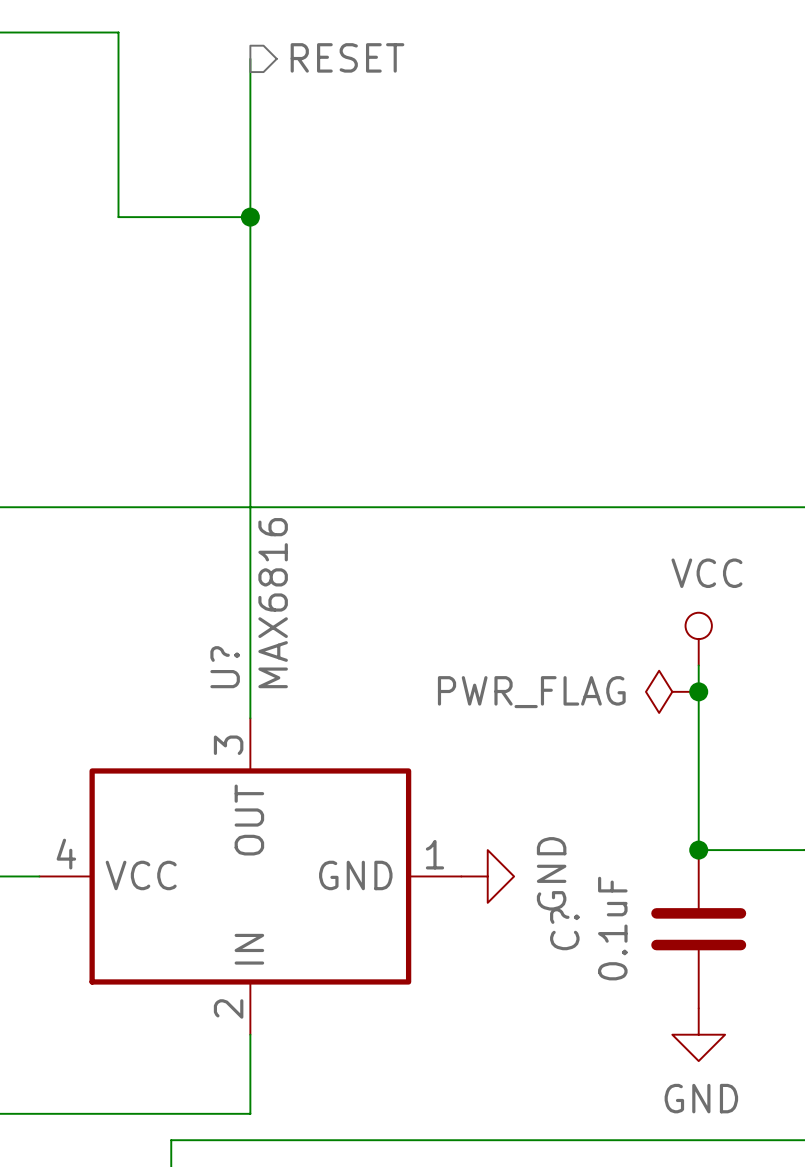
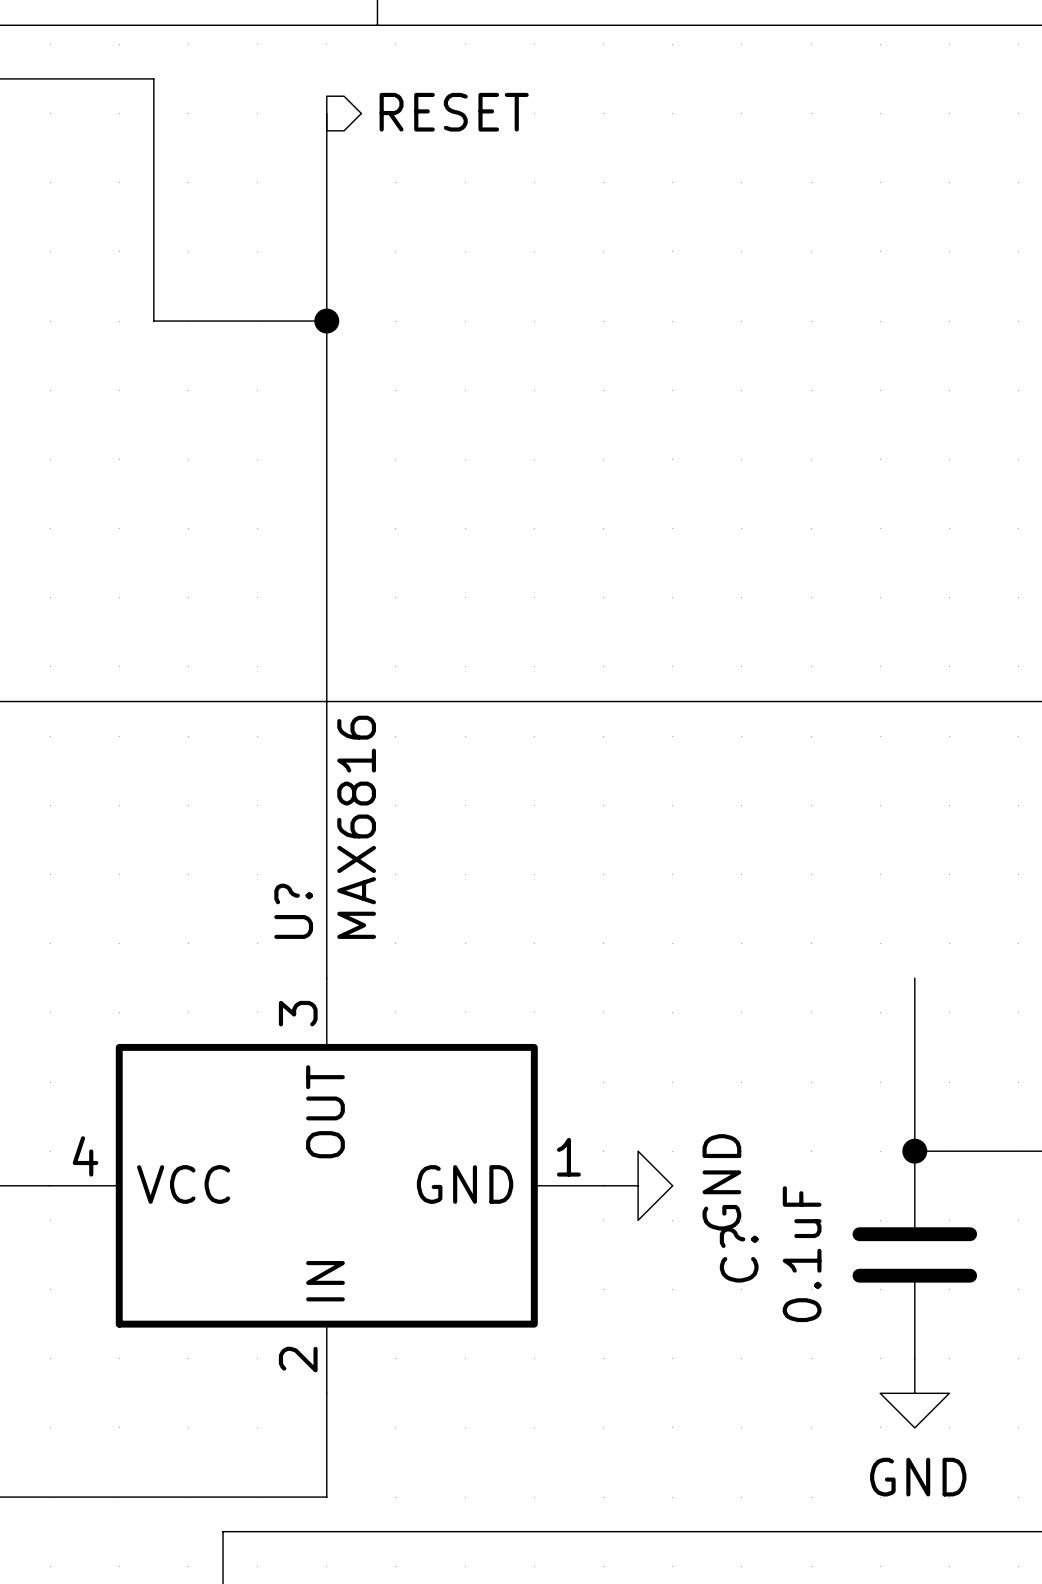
power symbol: VCC (698, 639) -> none
wire: (698, 665) (698, 718) -> none
power symbol: PWR_FLAG (672, 691) -> none
junction: (698, 691) -> none

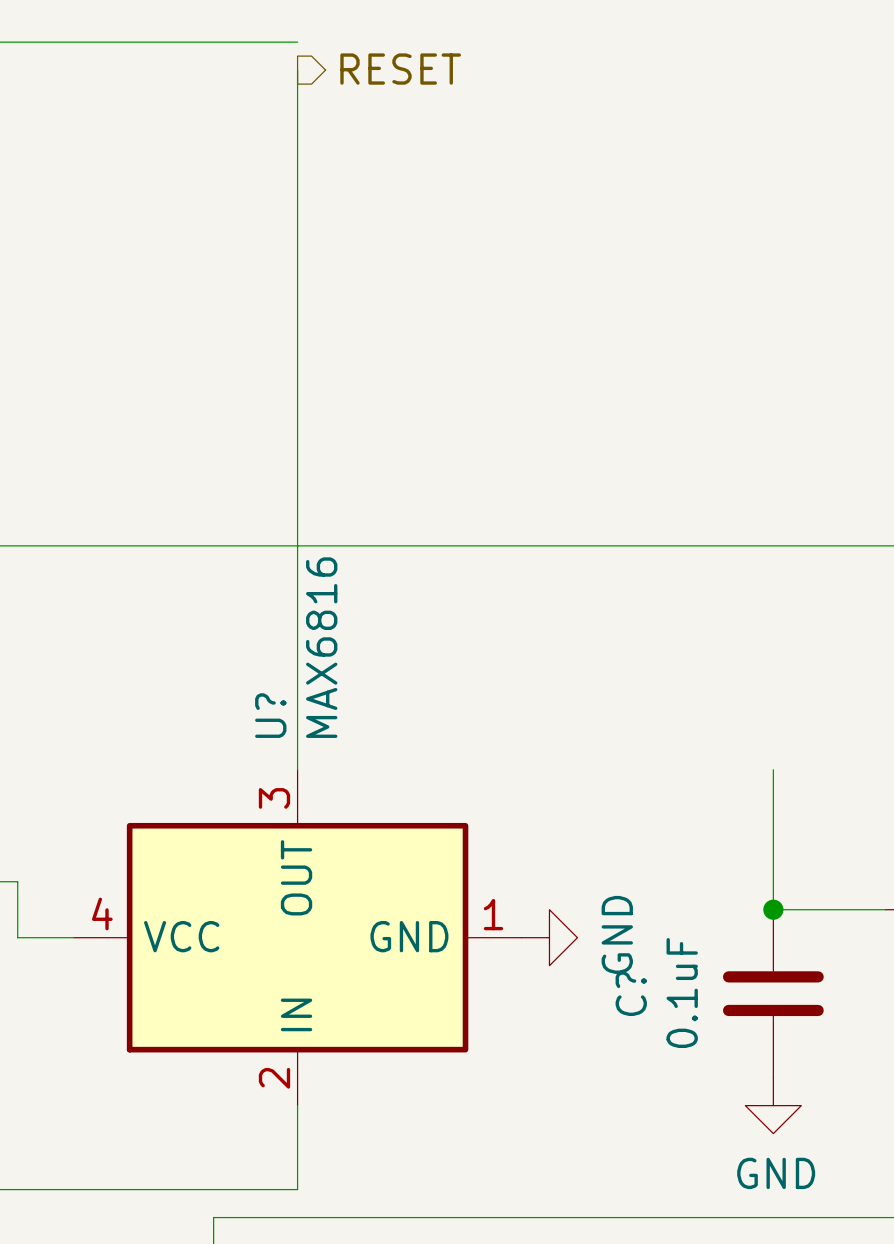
wire: (153, 78) (153, 321) (326, 321) -> (157, 42) (297, 42)
junction: (326, 321) -> none

